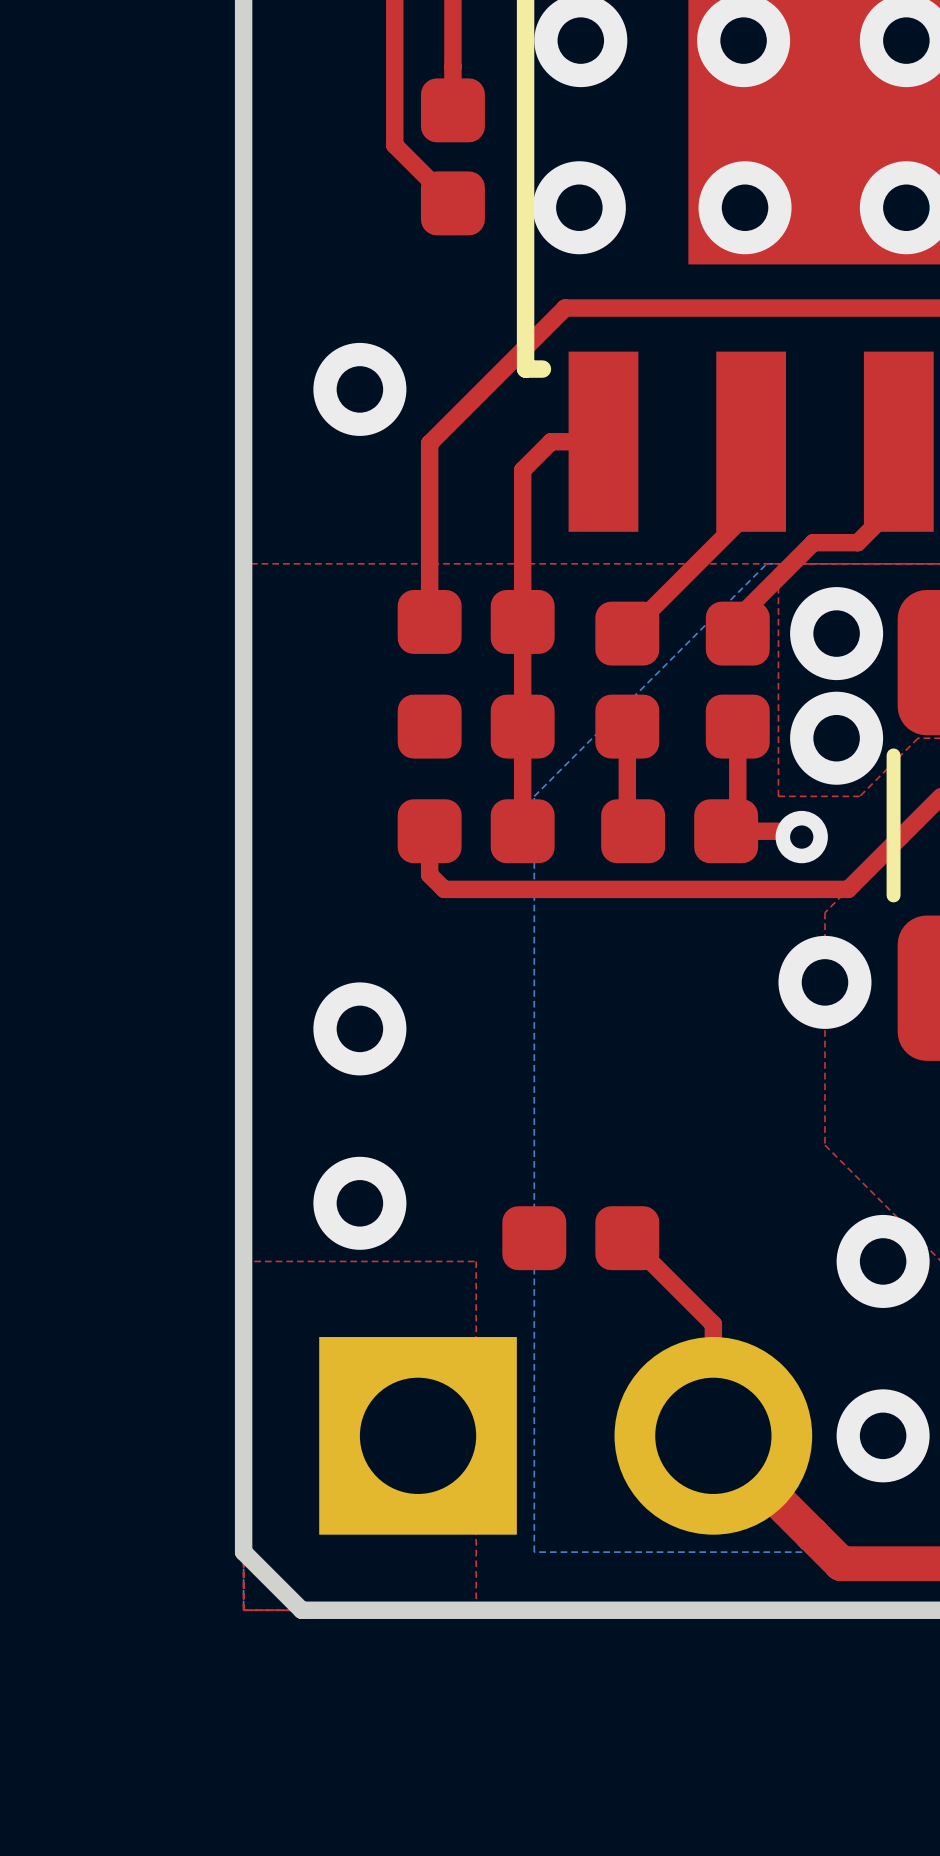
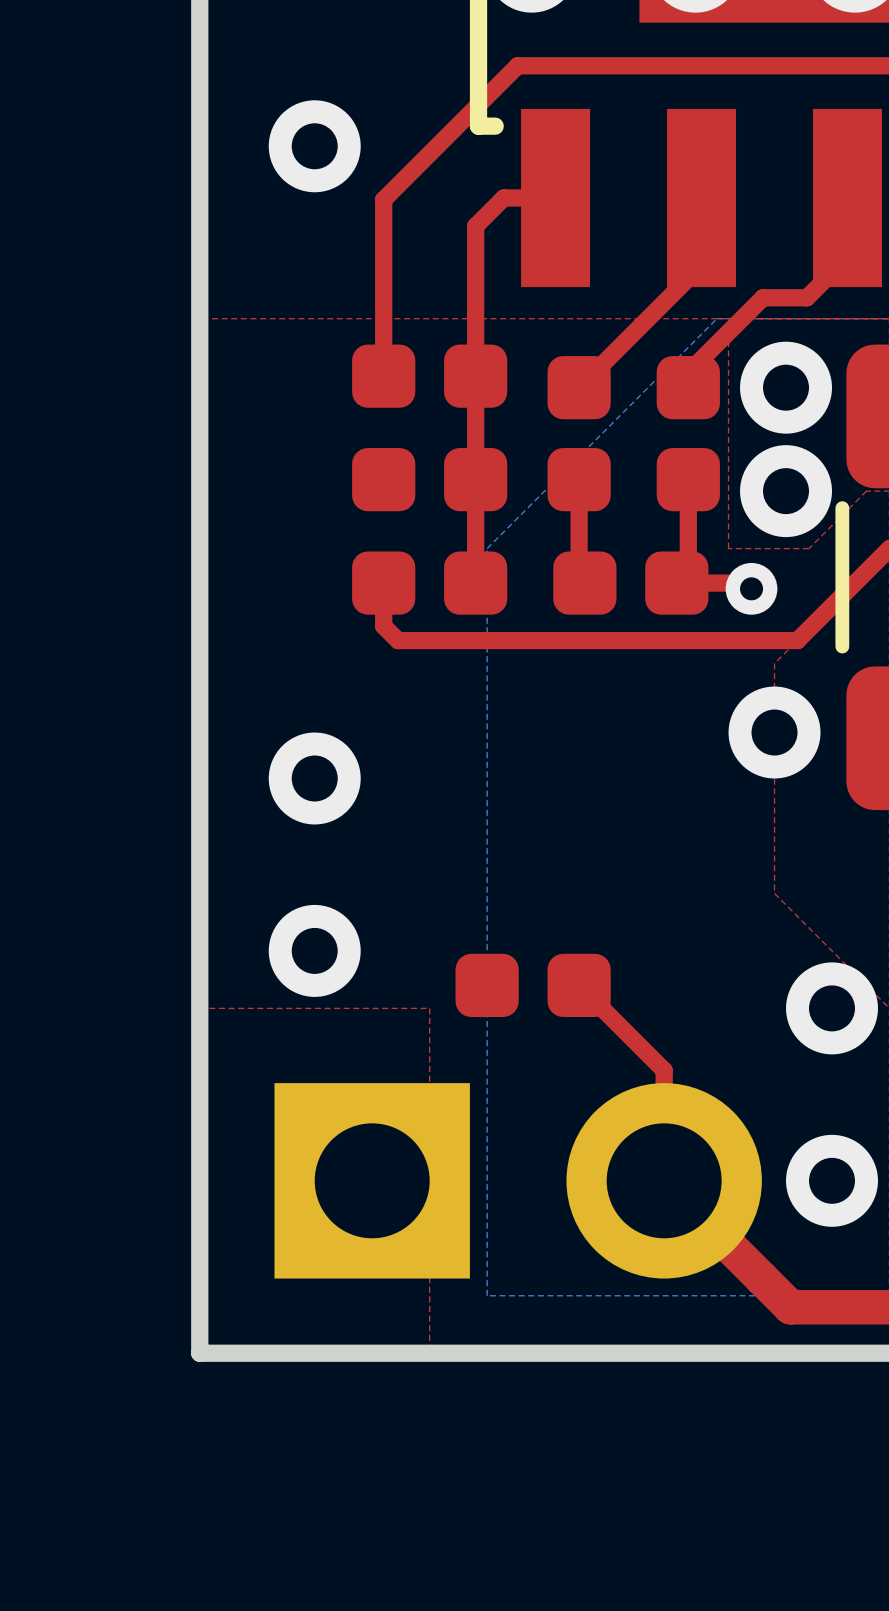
board edge: (243, 1552) (301, 1610) -> (199, 1295) (199, 1353) (257, 1353)

